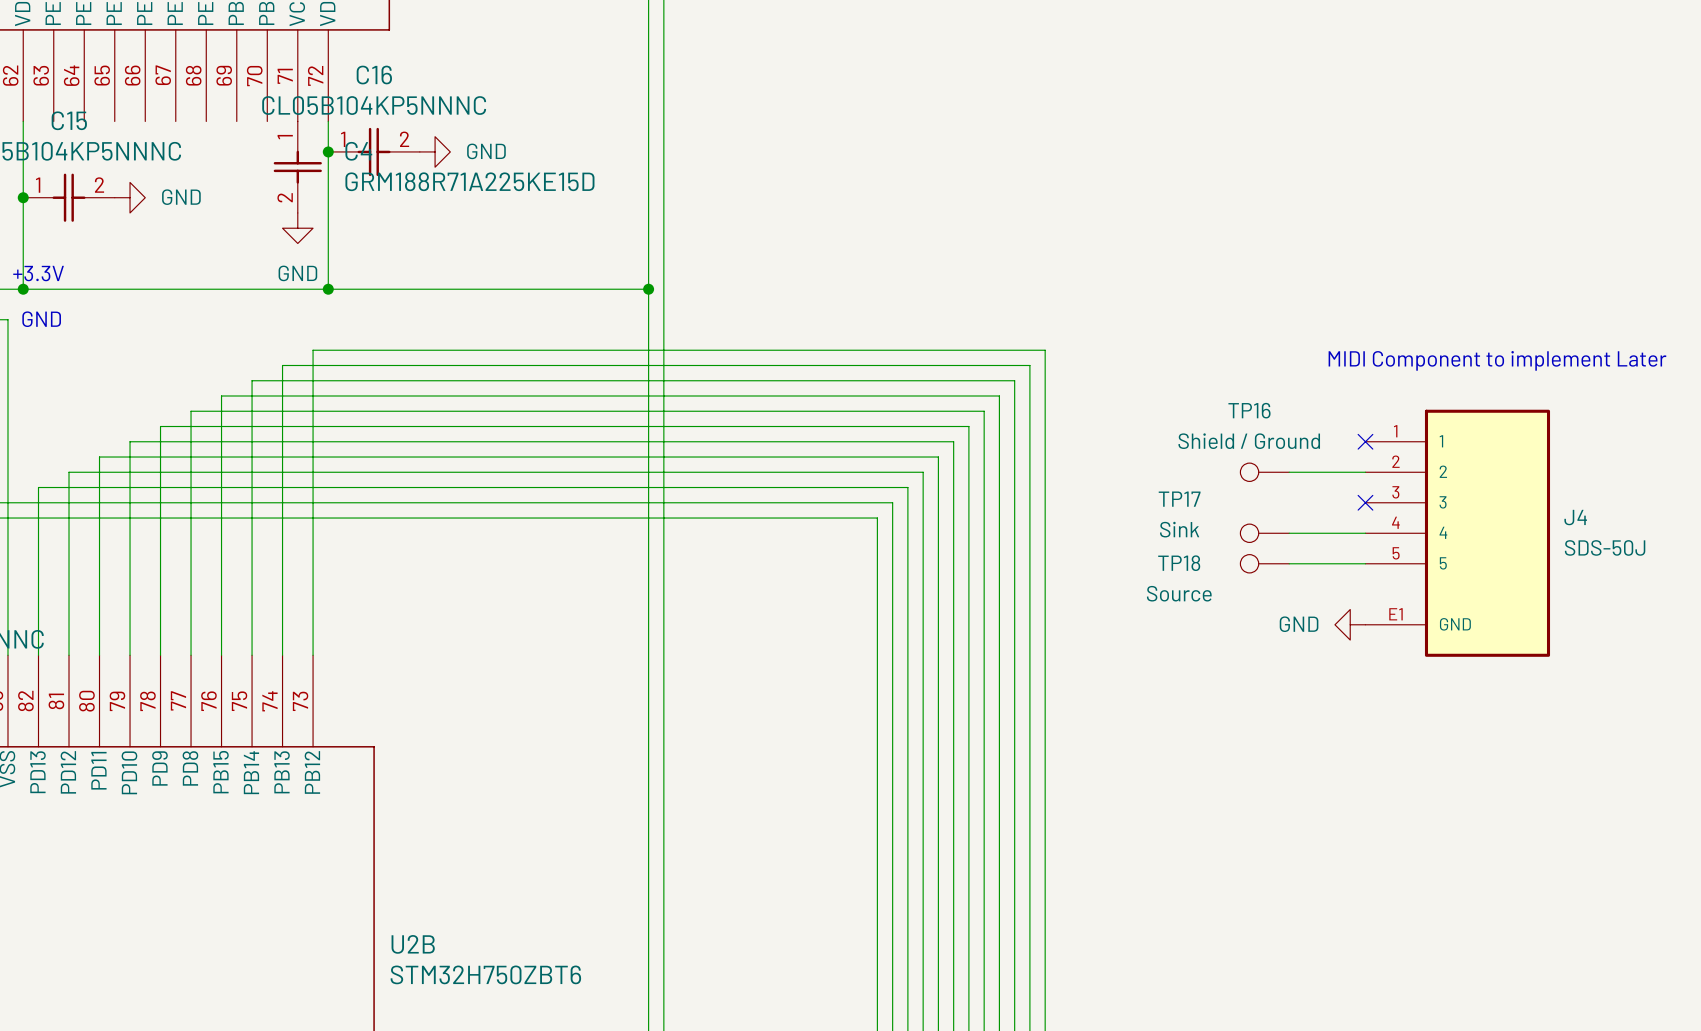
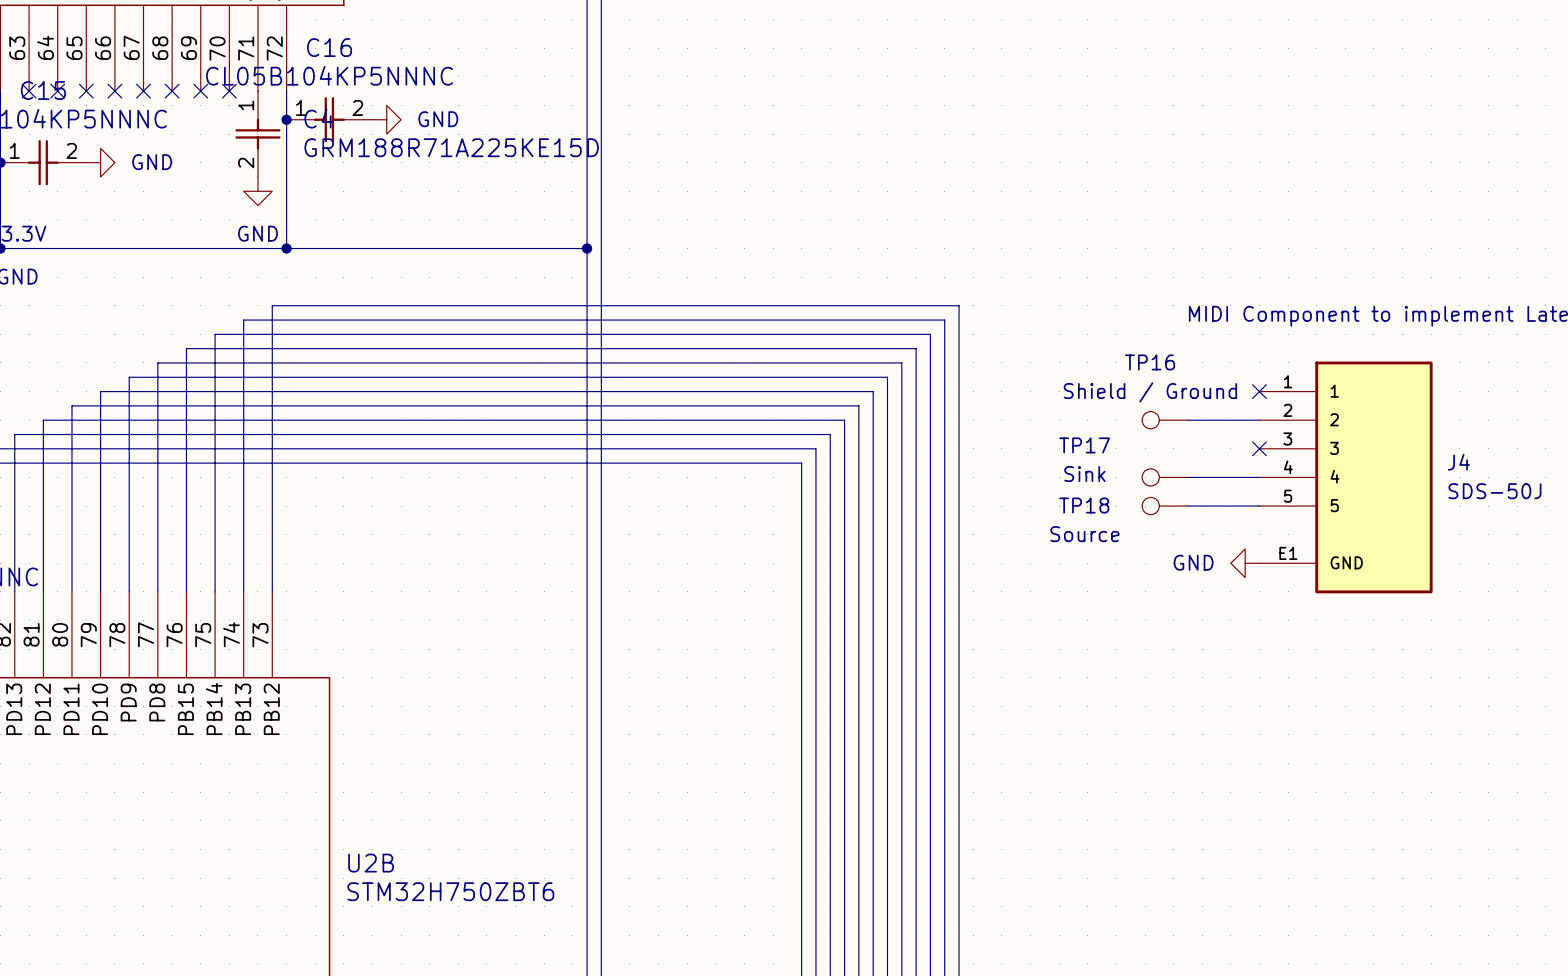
no-connect mark: none -> (29, 91)
no-connect mark: none -> (57, 91)
no-connect mark: none -> (86, 91)
no-connect mark: none -> (114, 91)
no-connect mark: none -> (143, 91)
no-connect mark: none -> (172, 91)
no-connect mark: none -> (200, 91)
no-connect mark: none -> (229, 91)

